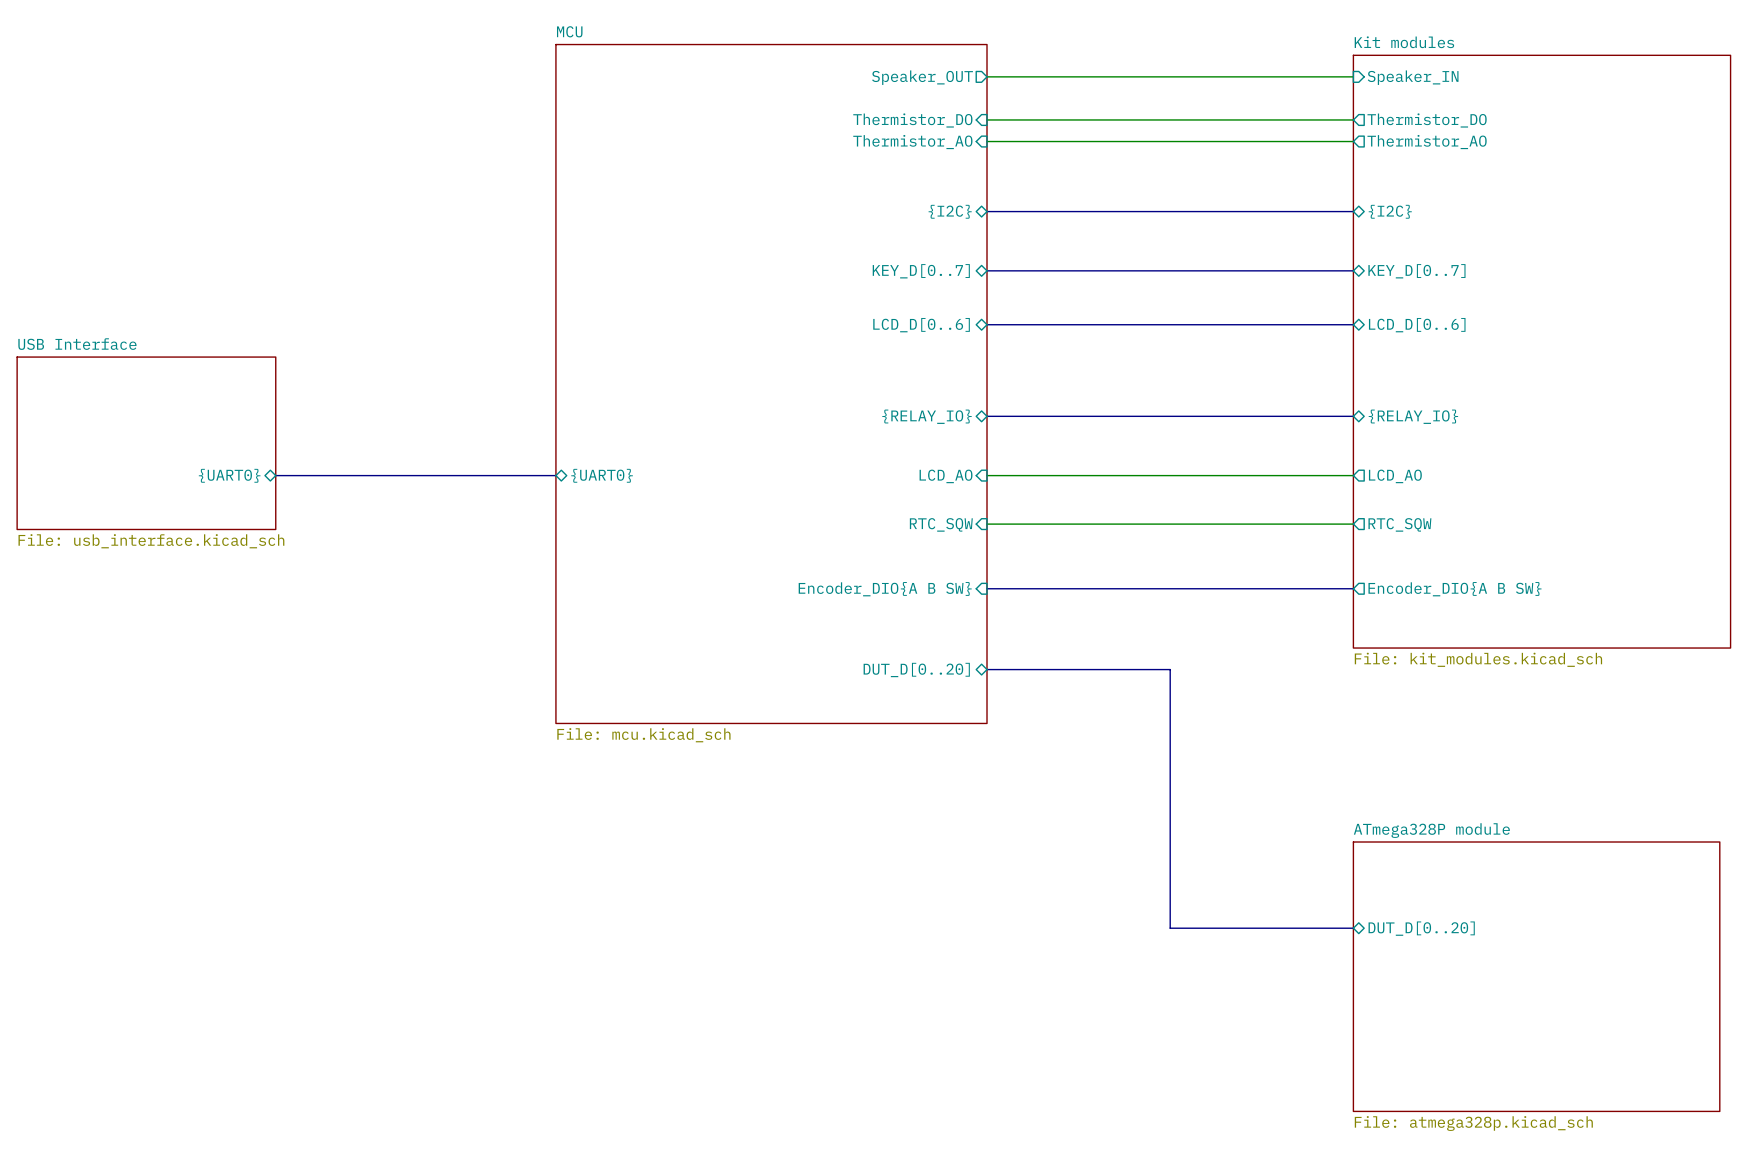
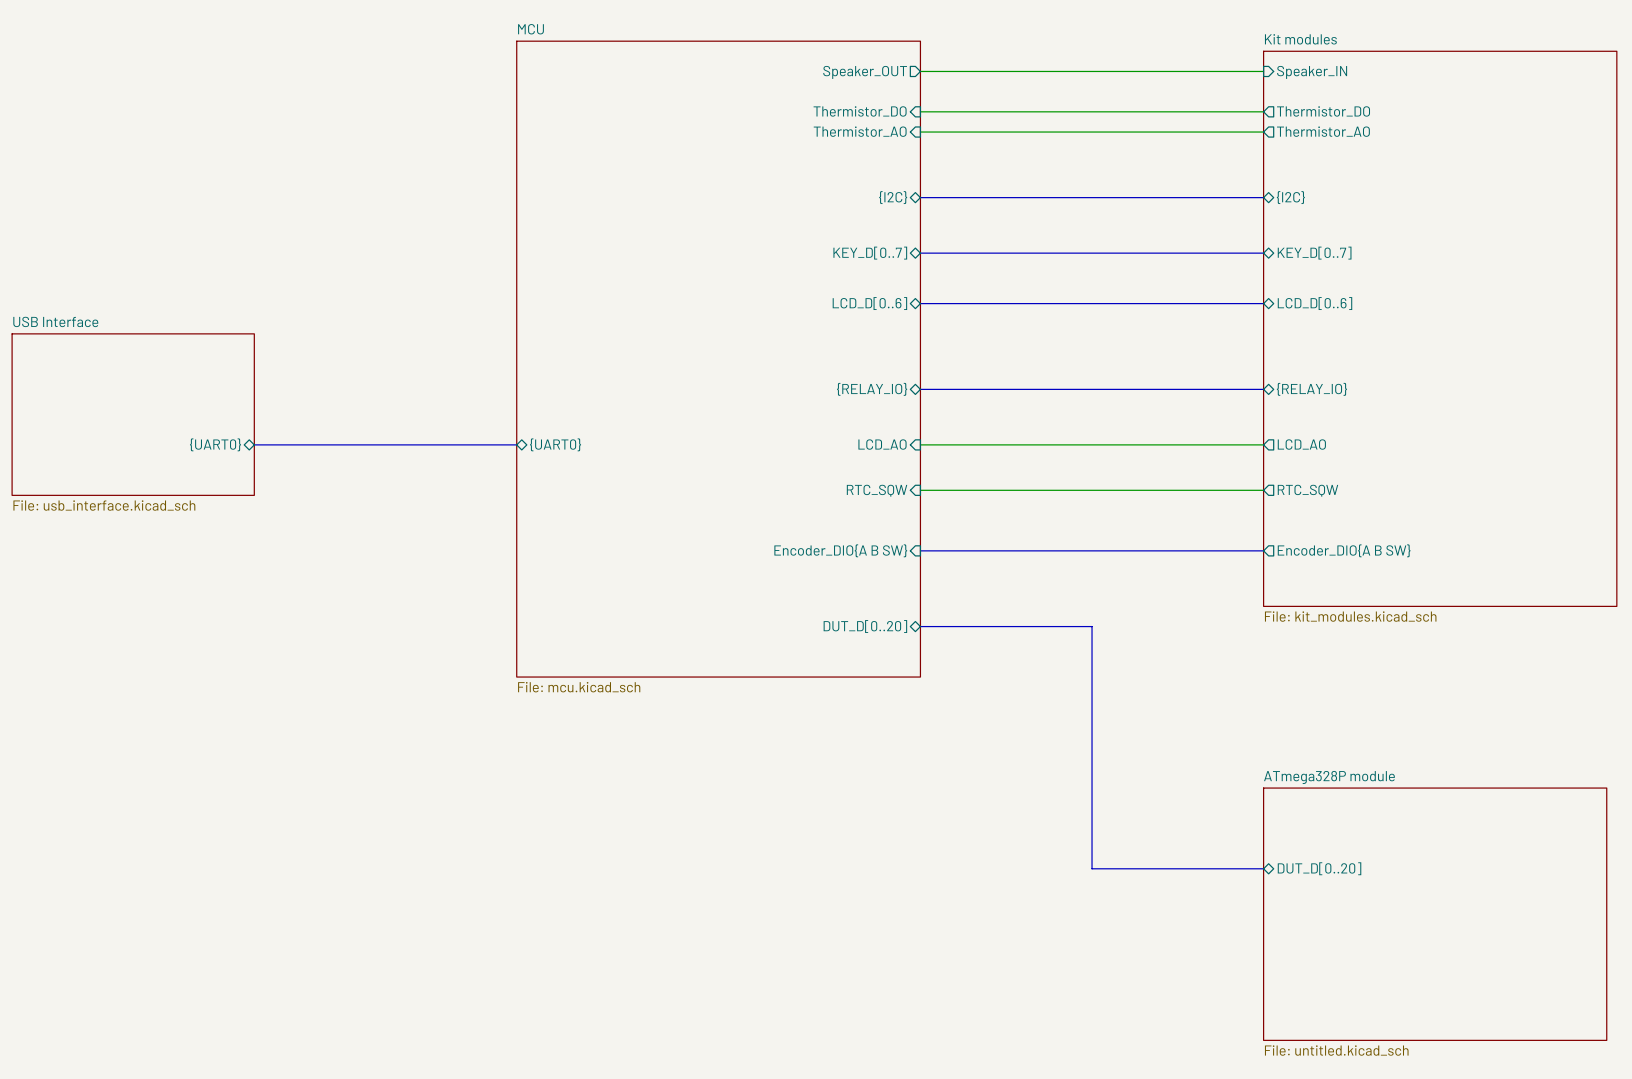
sheet ATmega328P module value: File: atmega328p.kicad_sch (1473, 1123) -> File: untitled.kicad_sch (1336, 1050)

